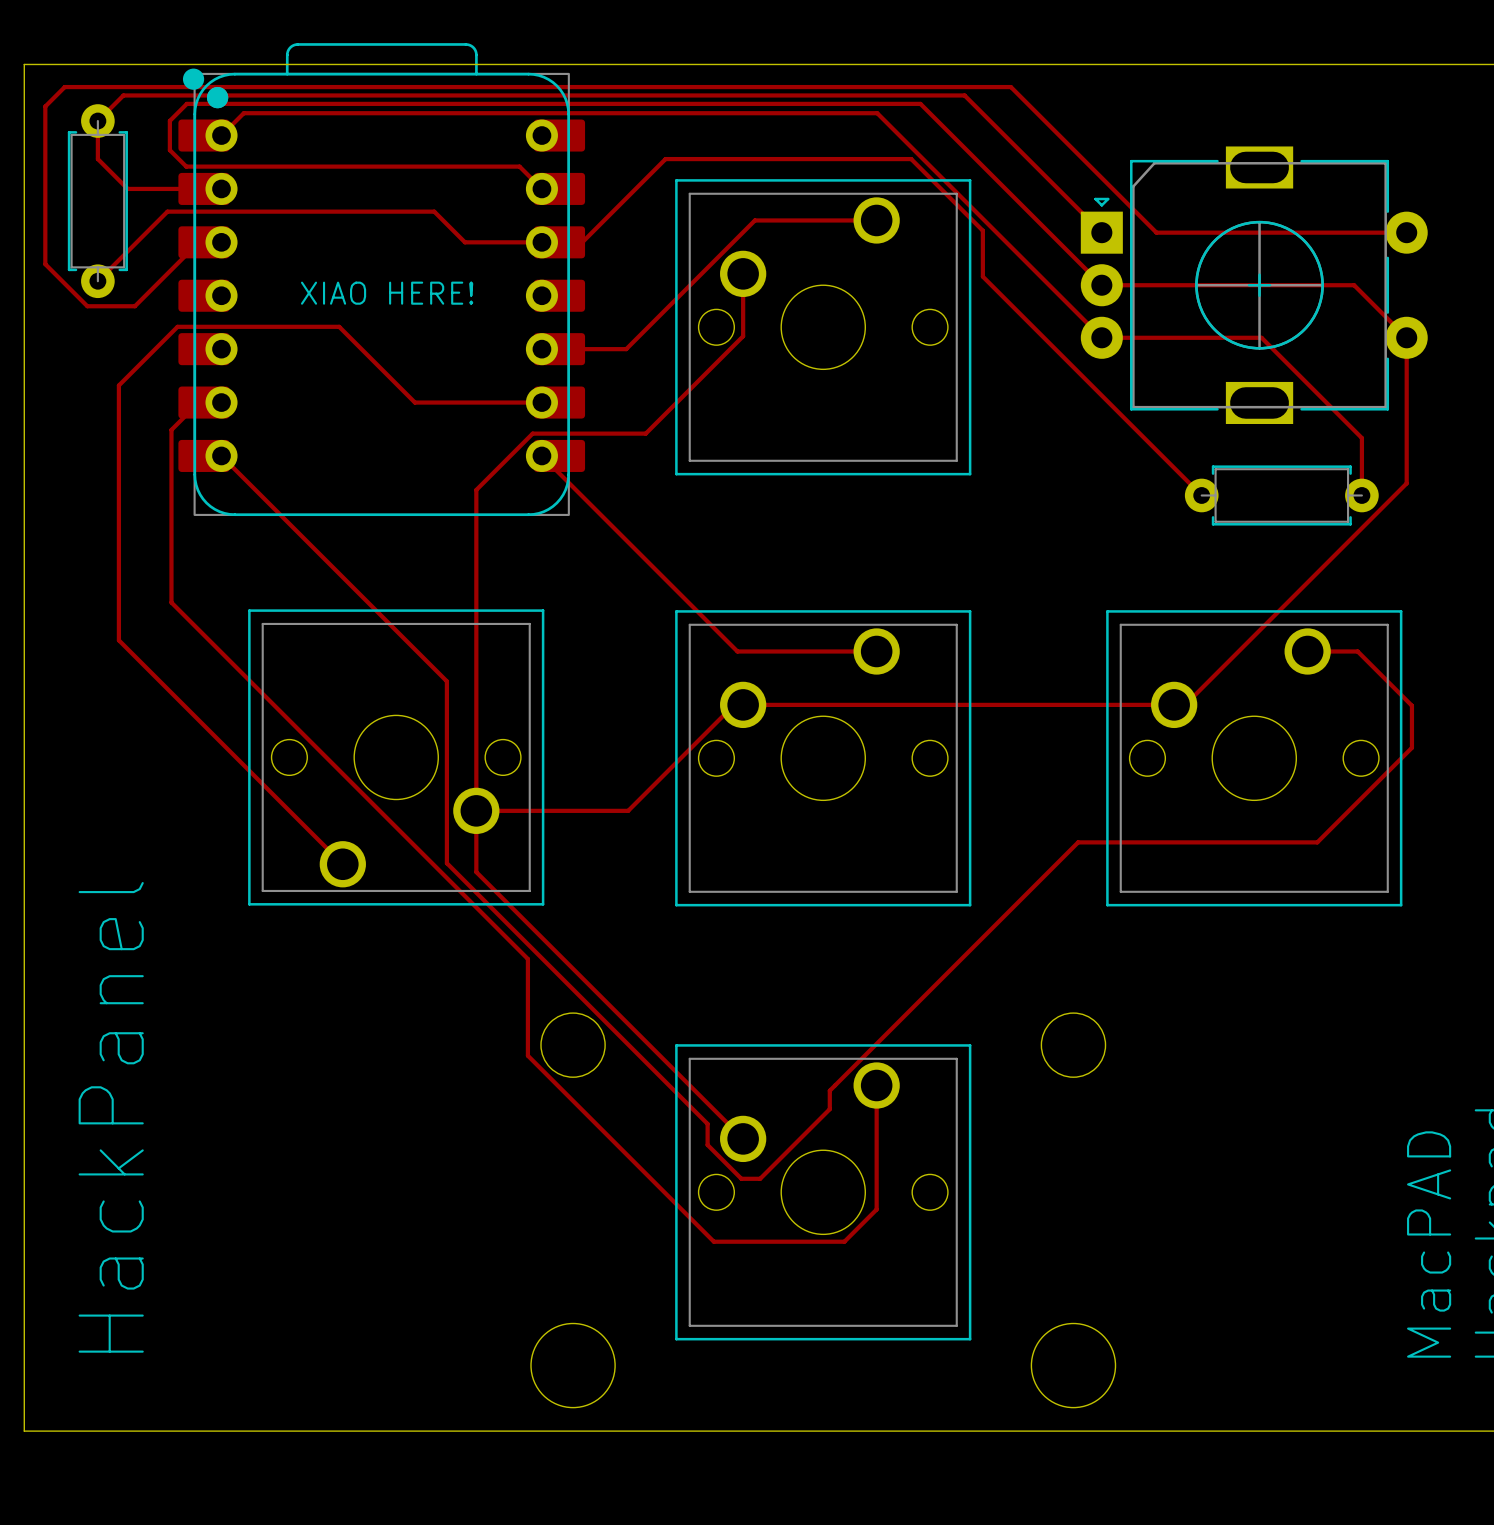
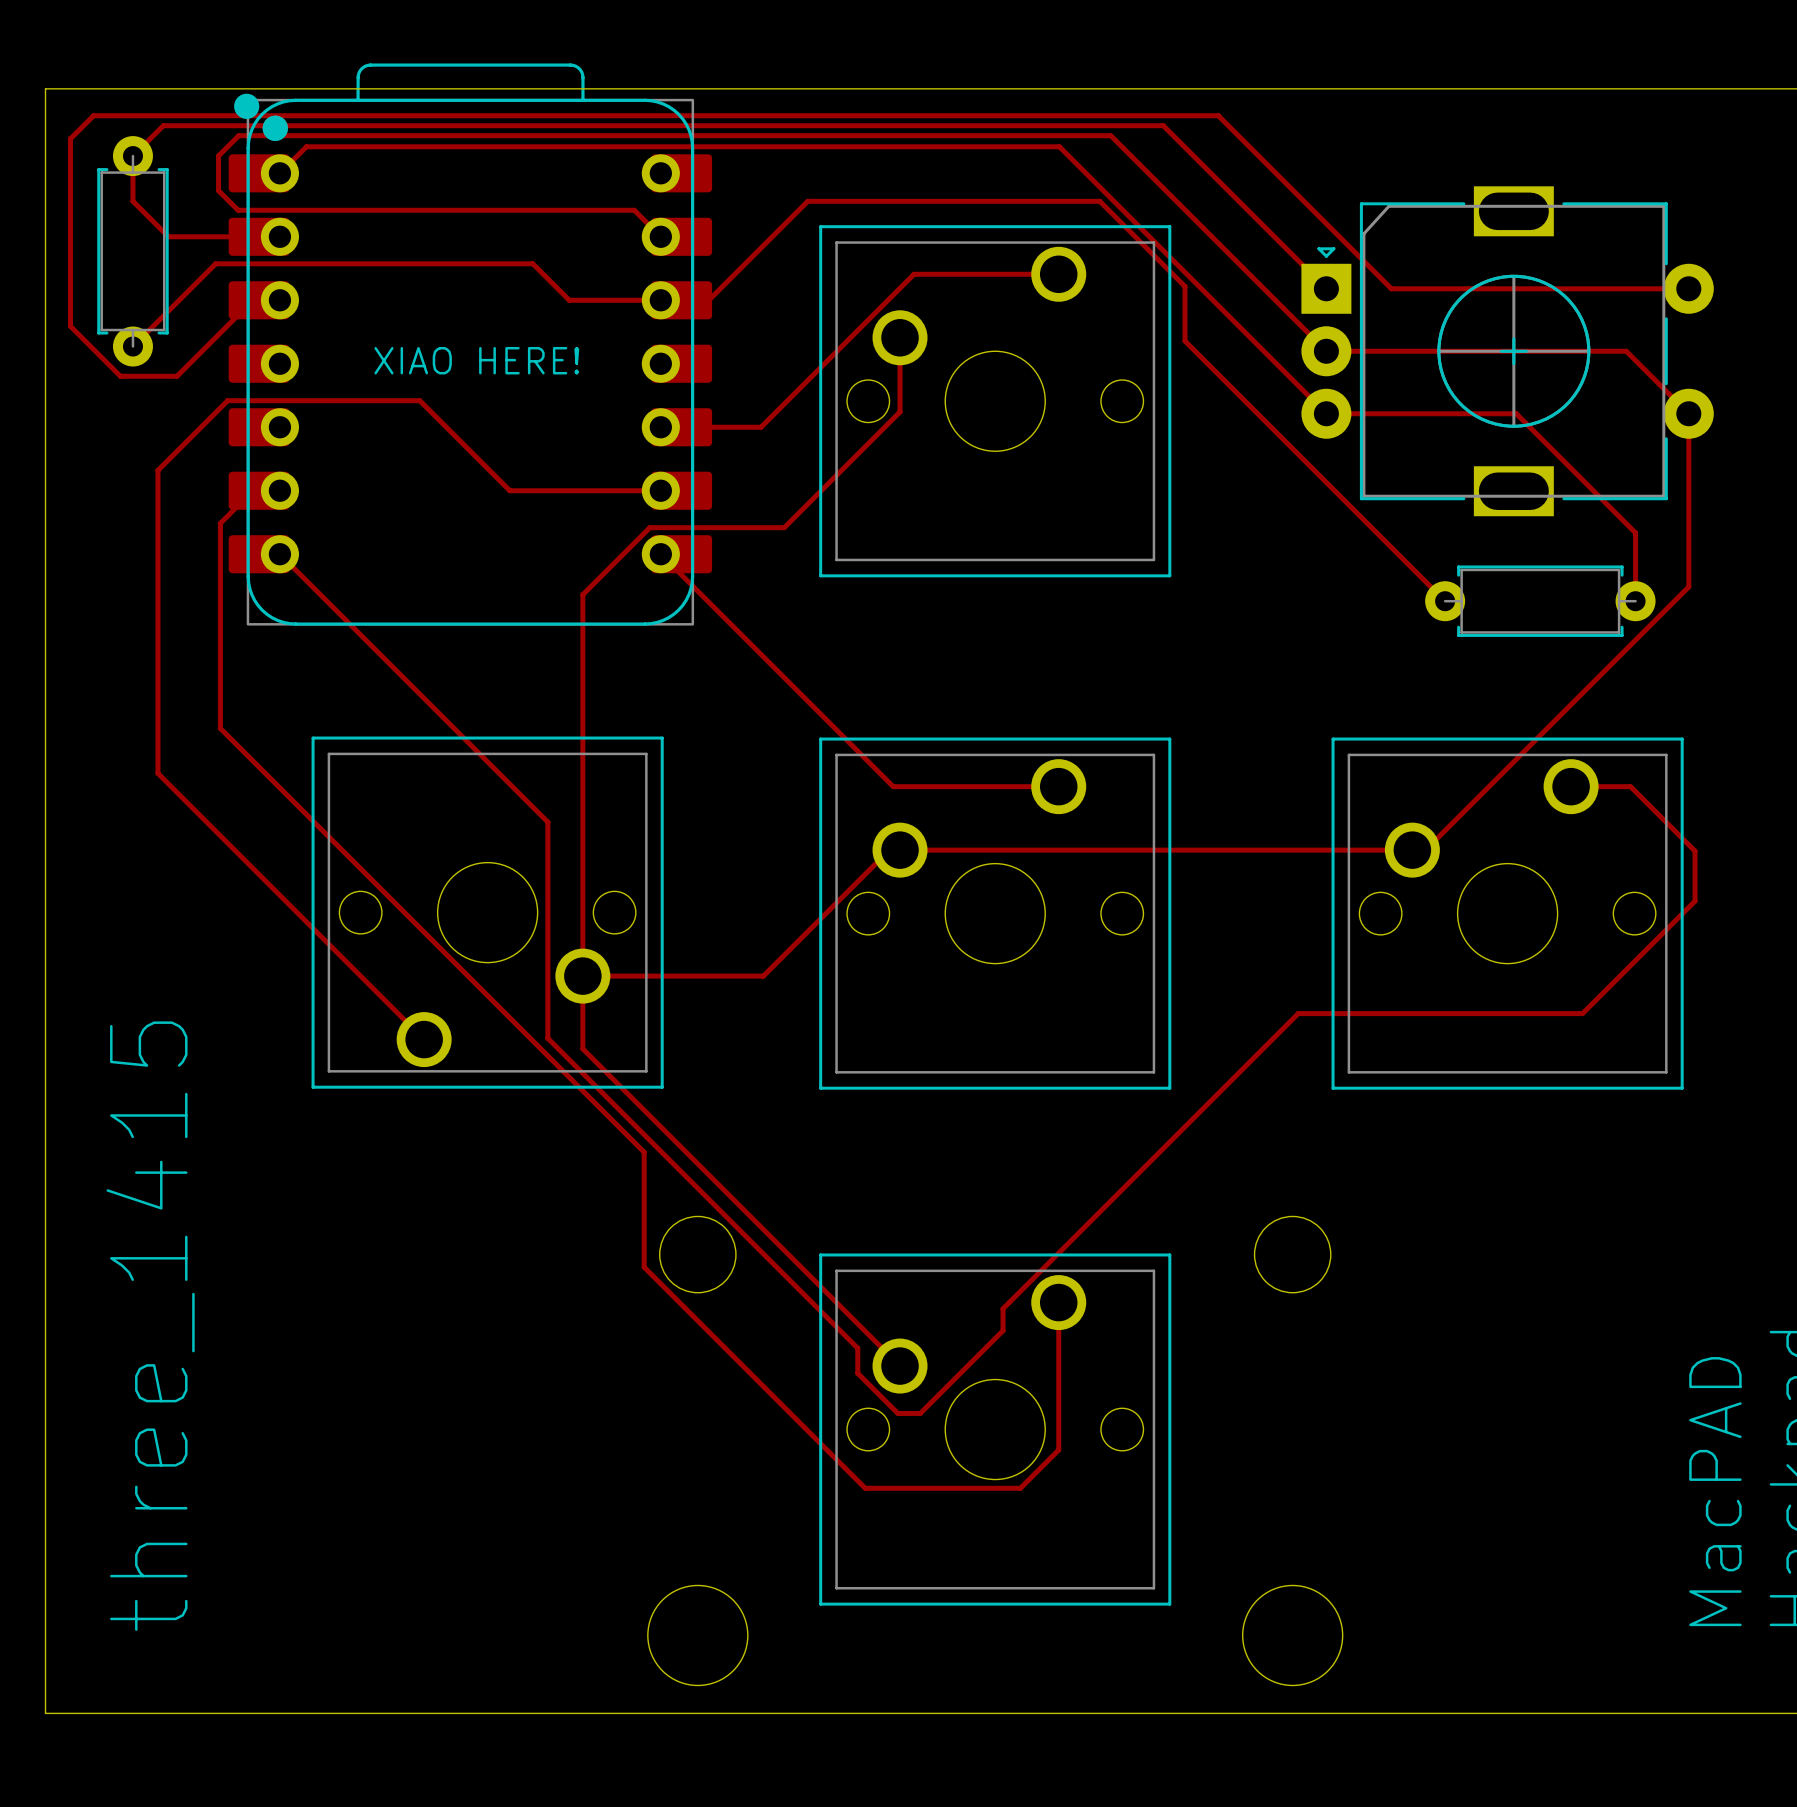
text: HackPanel (111, 1117) -> three_1415 (150, 1326)

